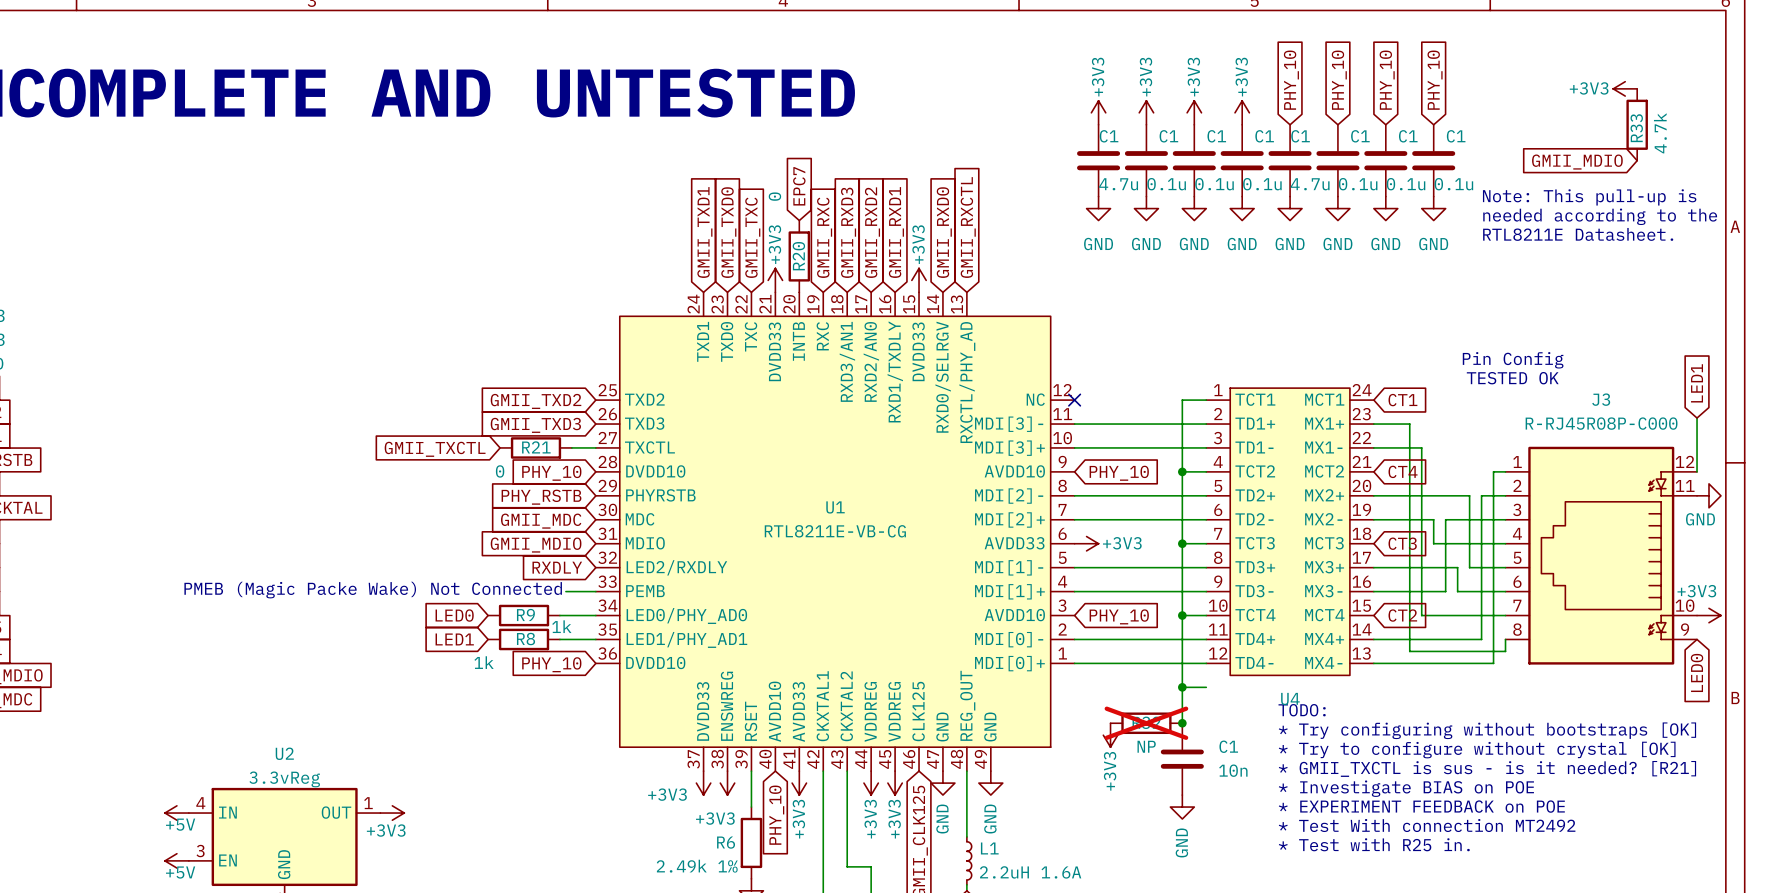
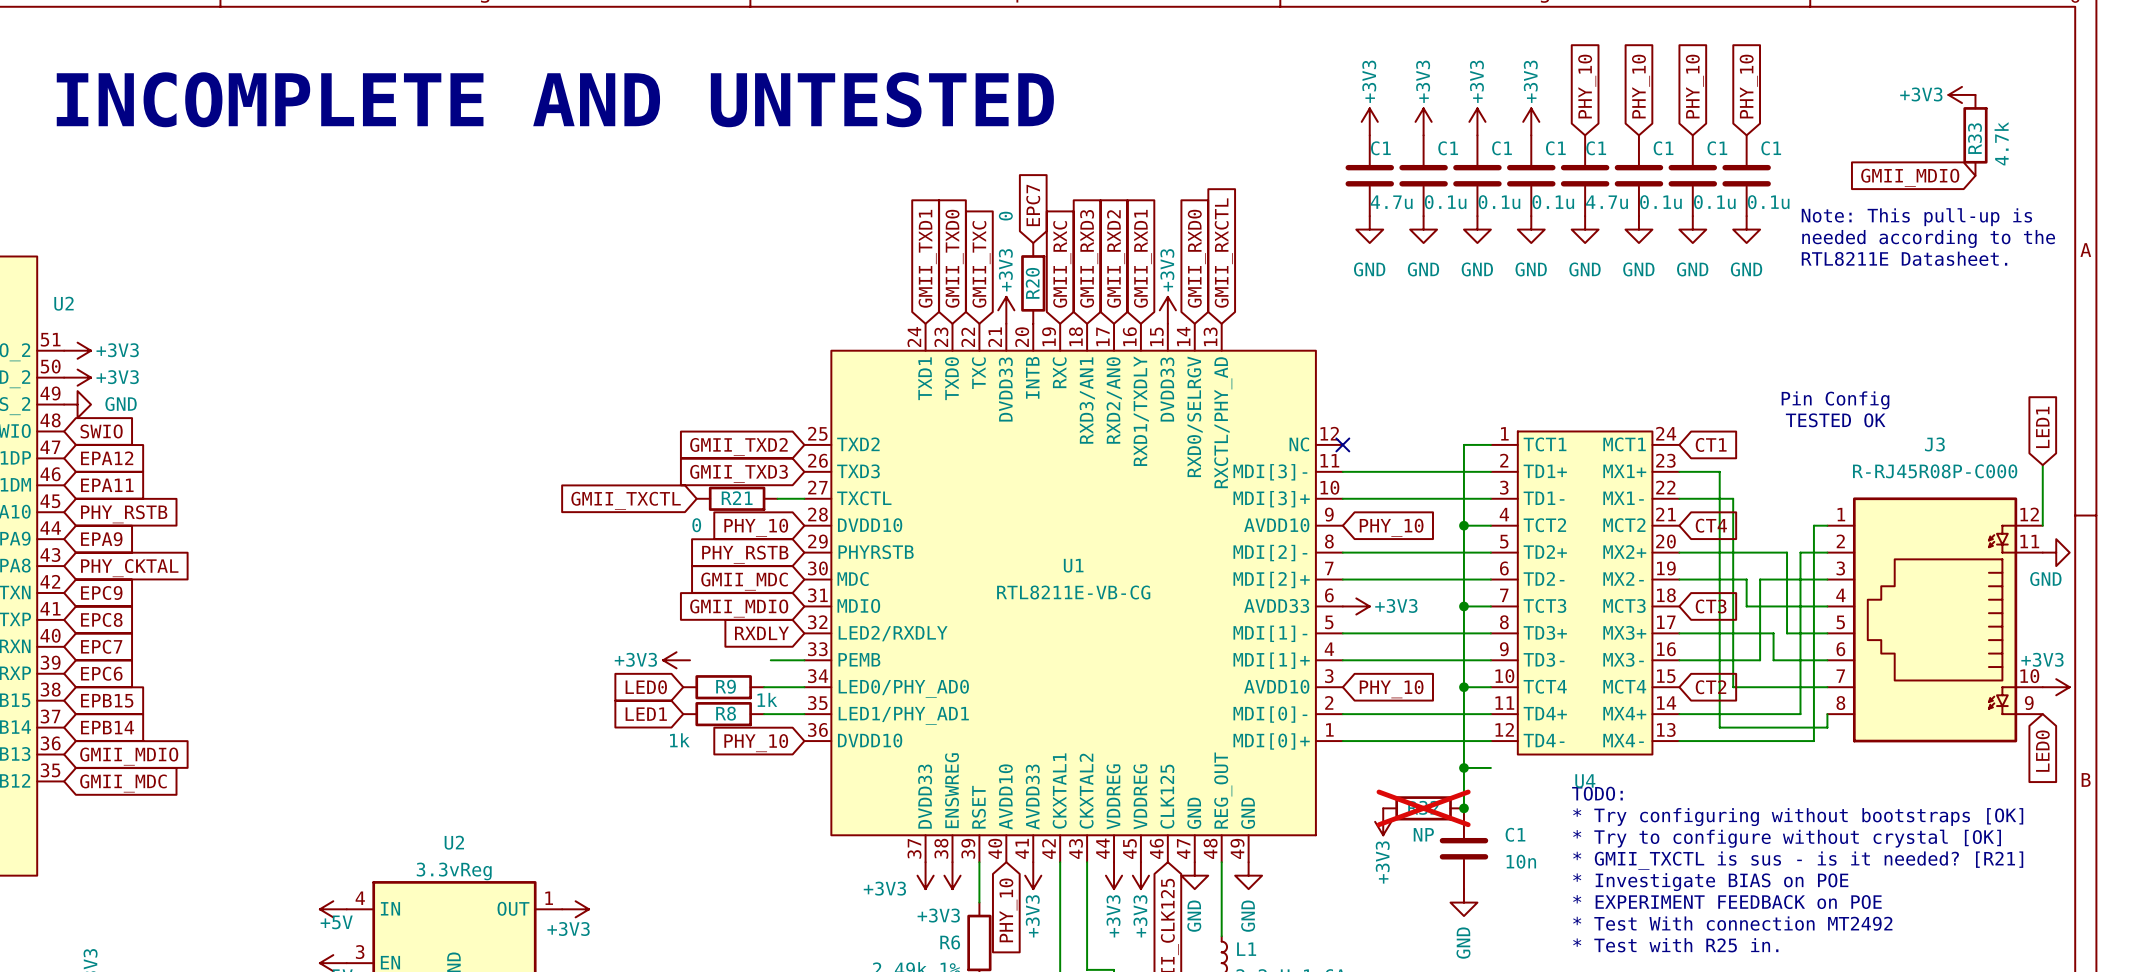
text: PMEB (Magic Packe Wake) Not Connected (373, 590) -> none
power symbol: none -> +3V3 (676, 660)

